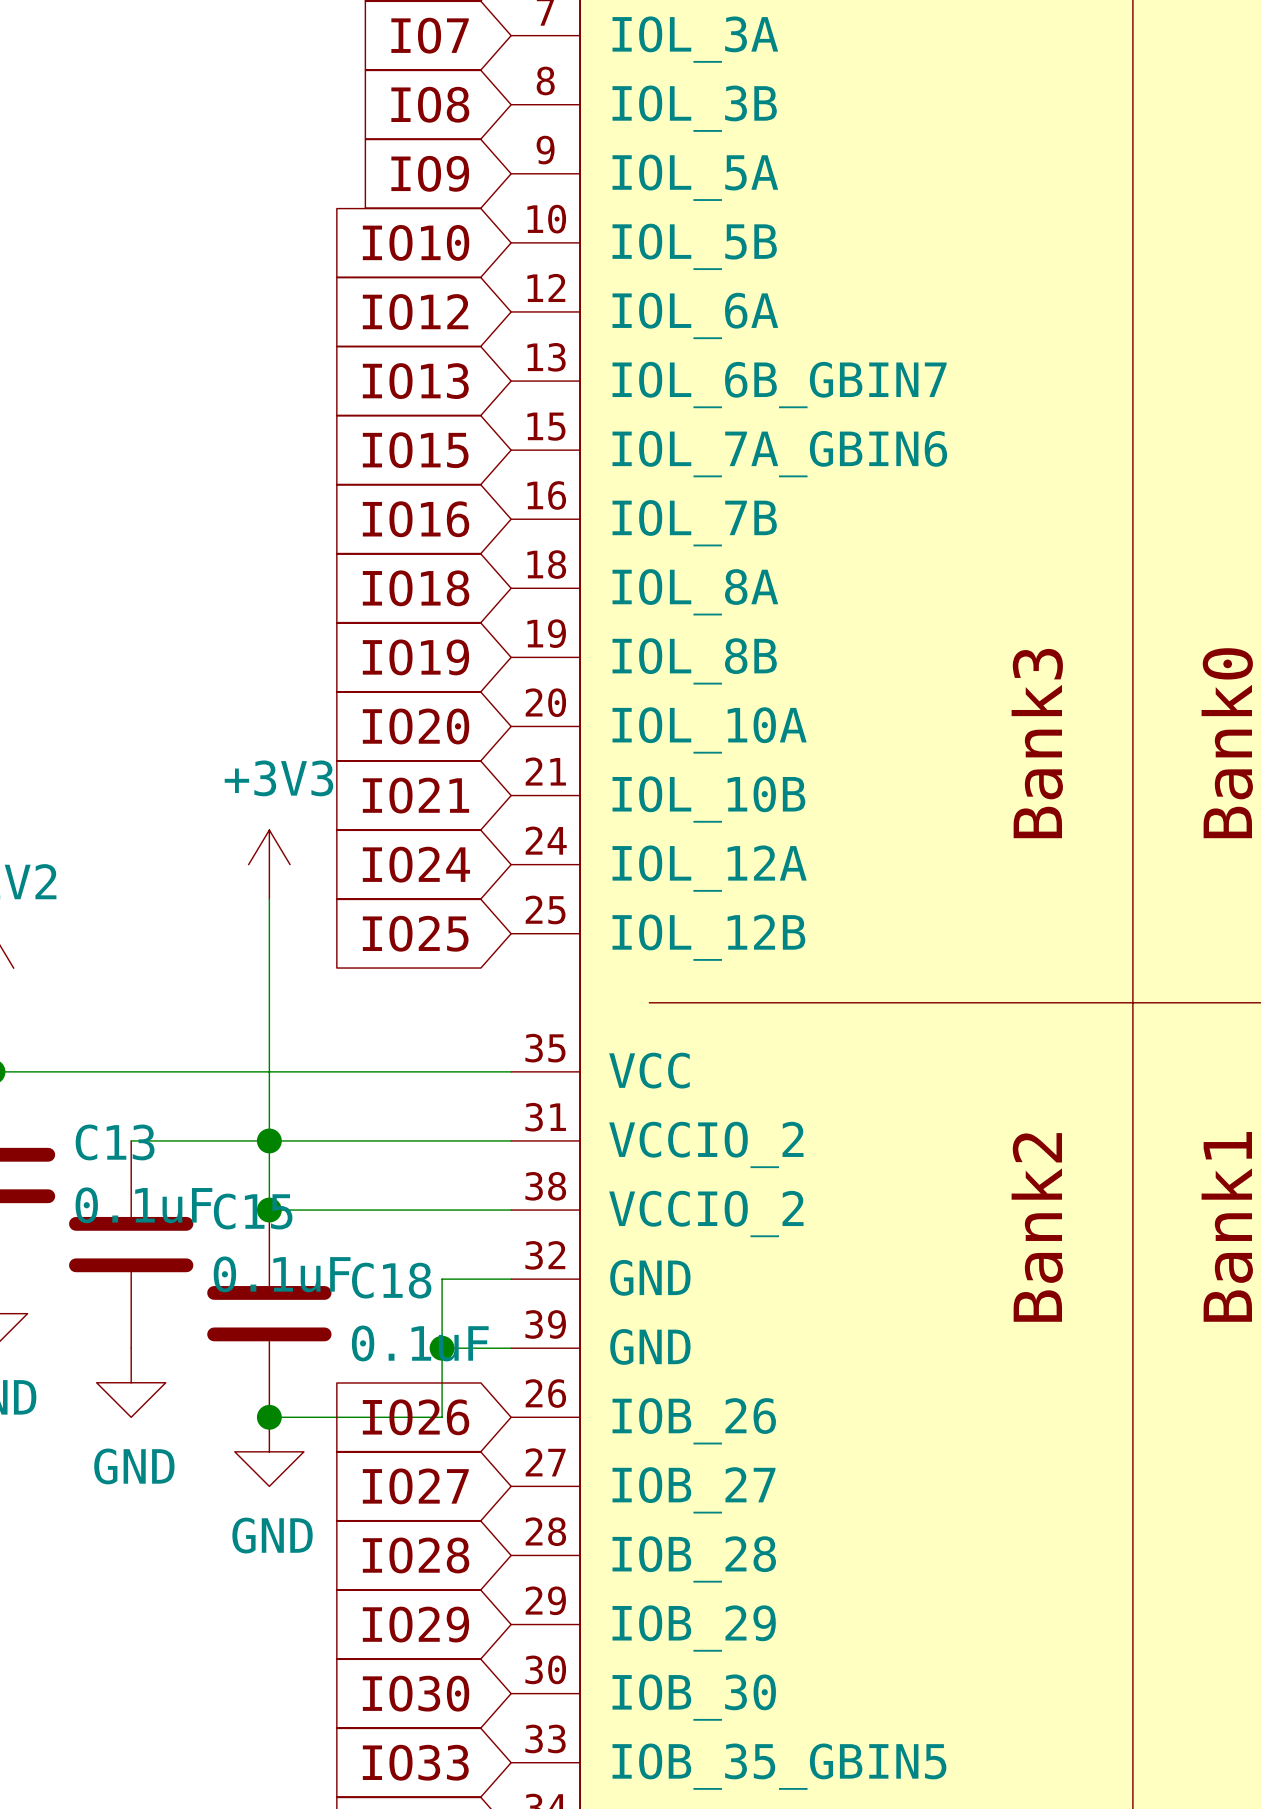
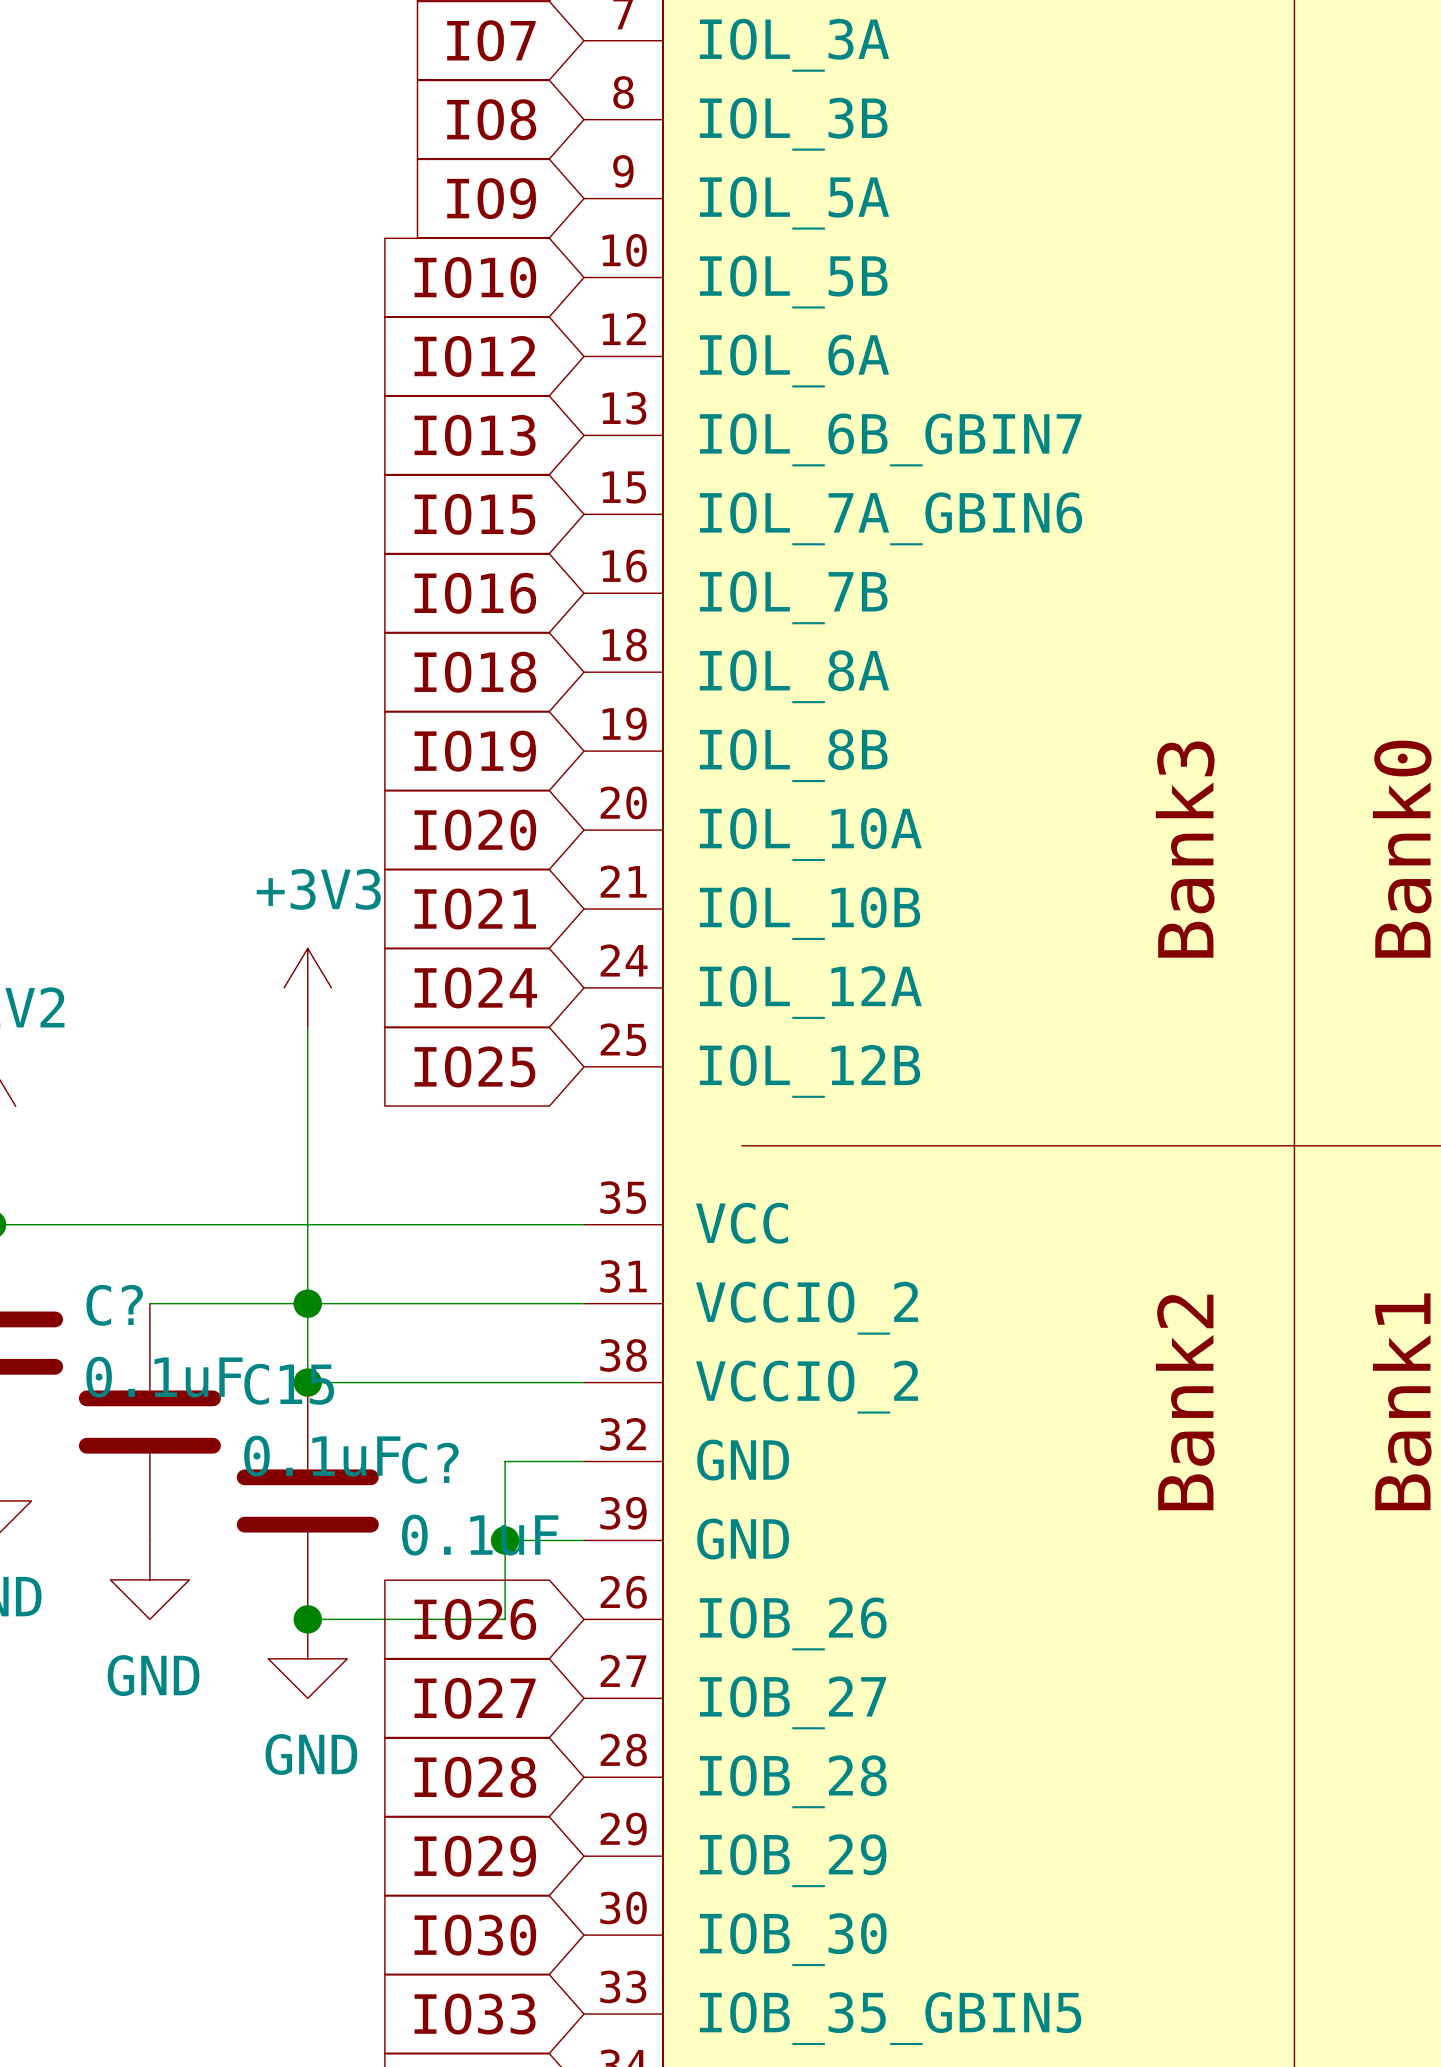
C13 name: C13 (115, 1142) -> C? (114, 1305)
C18 name: C18 (391, 1280) -> C? (430, 1463)

